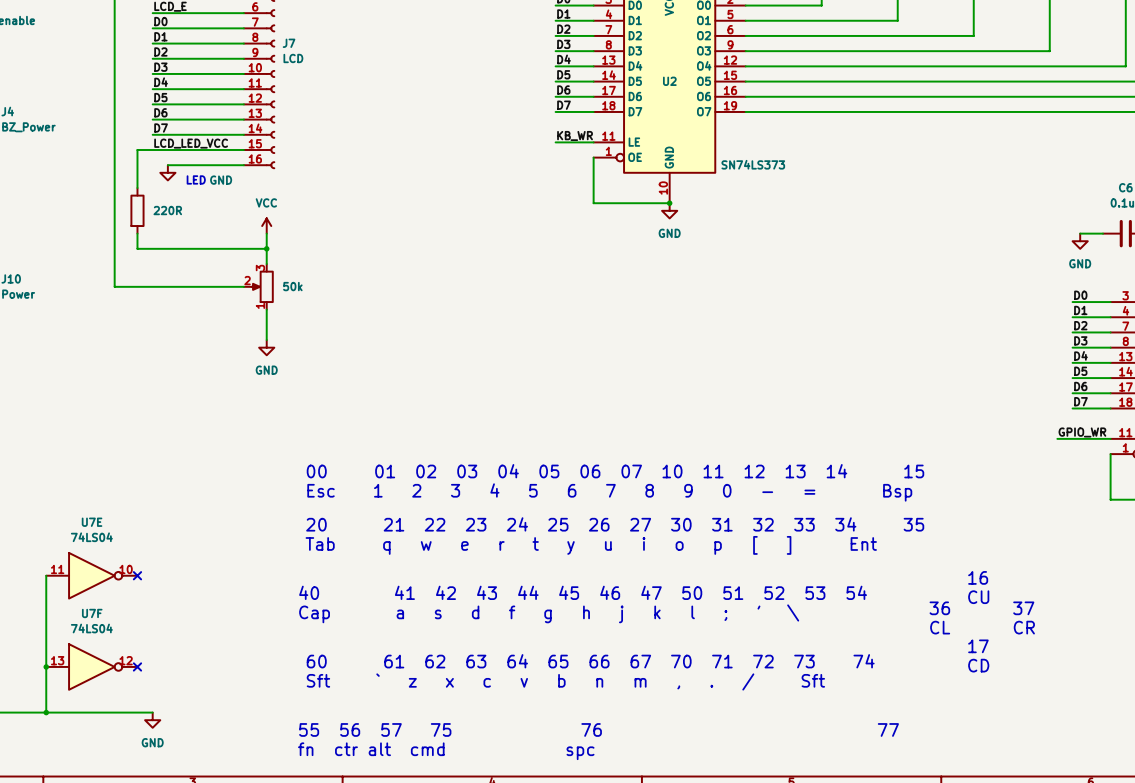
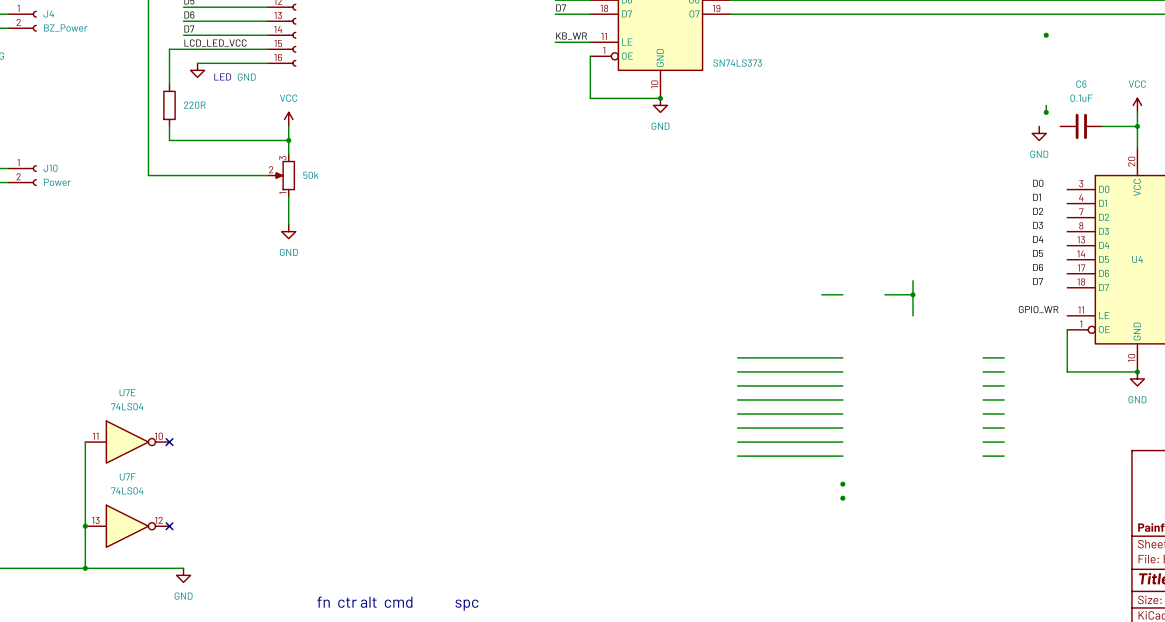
junction: none -> (1046, 35)
wire: none -> (1046, 105) (1046, 112)
junction: none -> (1046, 112)
wire: (1080, 233) (1103, 233) -> none
wire: (1072, 302) (1110, 302) -> none
wire: (1072, 317) (1110, 317) -> none
wire: (1072, 332) (1110, 332) -> none
wire: (1072, 347) (1110, 347) -> none
wire: (1072, 362) (1110, 362) -> none
wire: (1072, 378) (1110, 378) -> none
wire: (1072, 393) (1110, 393) -> none
wire: none -> (912, 280) (912, 315)
wire: (1072, 408) (1110, 408) -> none
wire: none -> (821, 294) (842, 294)
wire: none -> (884, 294) (912, 294)
junction: none -> (912, 294)
wire: (1057, 438) (1110, 438) -> none
text: 00 01 02 03 04 05 06 07 10 11 12 13 14 15 (615, 471) -> none
wire: none -> (737, 357) (842, 357)
wire: none -> (983, 357) (1004, 357)
text: Esc 1 2 3 4 5 6 7 8 9 0 - = Bsp (609, 492) -> none
wire: none -> (737, 371) (842, 371)
wire: none -> (983, 371) (1004, 371)
wire: none -> (737, 385) (842, 385)
wire: none -> (983, 385) (1004, 385)
text: 20 21 22 23 24 25 26 27 30 31 32 33 34 35 (615, 524) -> none
wire: none -> (737, 399) (842, 399)
wire: none -> (983, 399) (1004, 399)
text: Tab q w e r t y u i o p [ ] Ent (591, 545) -> none
wire: none -> (737, 414) (842, 414)
wire: none -> (983, 414) (1004, 414)
wire: none -> (737, 428) (842, 428)
wire: none -> (983, 428) (1004, 428)
wire: none -> (737, 442) (842, 442)
wire: none -> (983, 442) (1004, 442)
text: 16 (978, 577) -> none
wire: none -> (737, 456) (842, 456)
wire: none -> (983, 456) (1004, 456)
text: 40 41 42 43 44 45 46 47 50 51 52 53 54 (583, 592) -> none
text: CU (978, 597) -> none
text: 36 (939, 608) -> none
text: 37 (1023, 608) -> none
text: Cap a s d f g h j k l ; ' \ (549, 613) -> none
junction: none -> (842, 484)
text: CL (940, 627) -> none
text: CR (1024, 627) -> none
junction: none -> (842, 498)
text: 17 (978, 646) -> none
text: 60 61 62 63 64 65 66 67 70 71 72 73 74 (590, 661) -> none
text: CD (978, 665) -> none
text: Sft ` z x c v b n m , . / Sft (565, 681) -> none
text: 55 56 57 75 76 77 (599, 729) -> none

